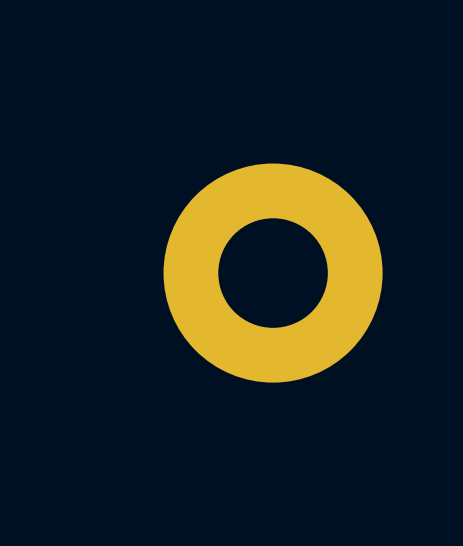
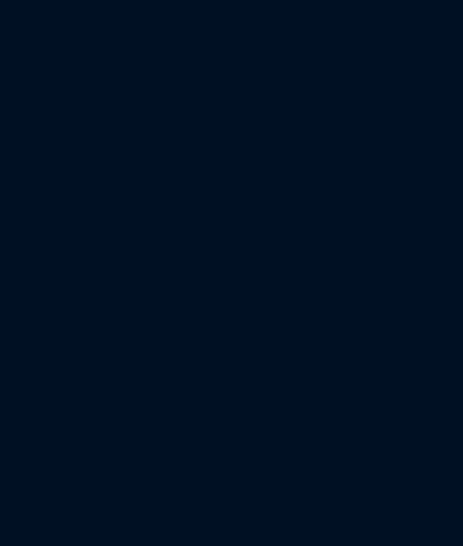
part: (273, 273) -> none

